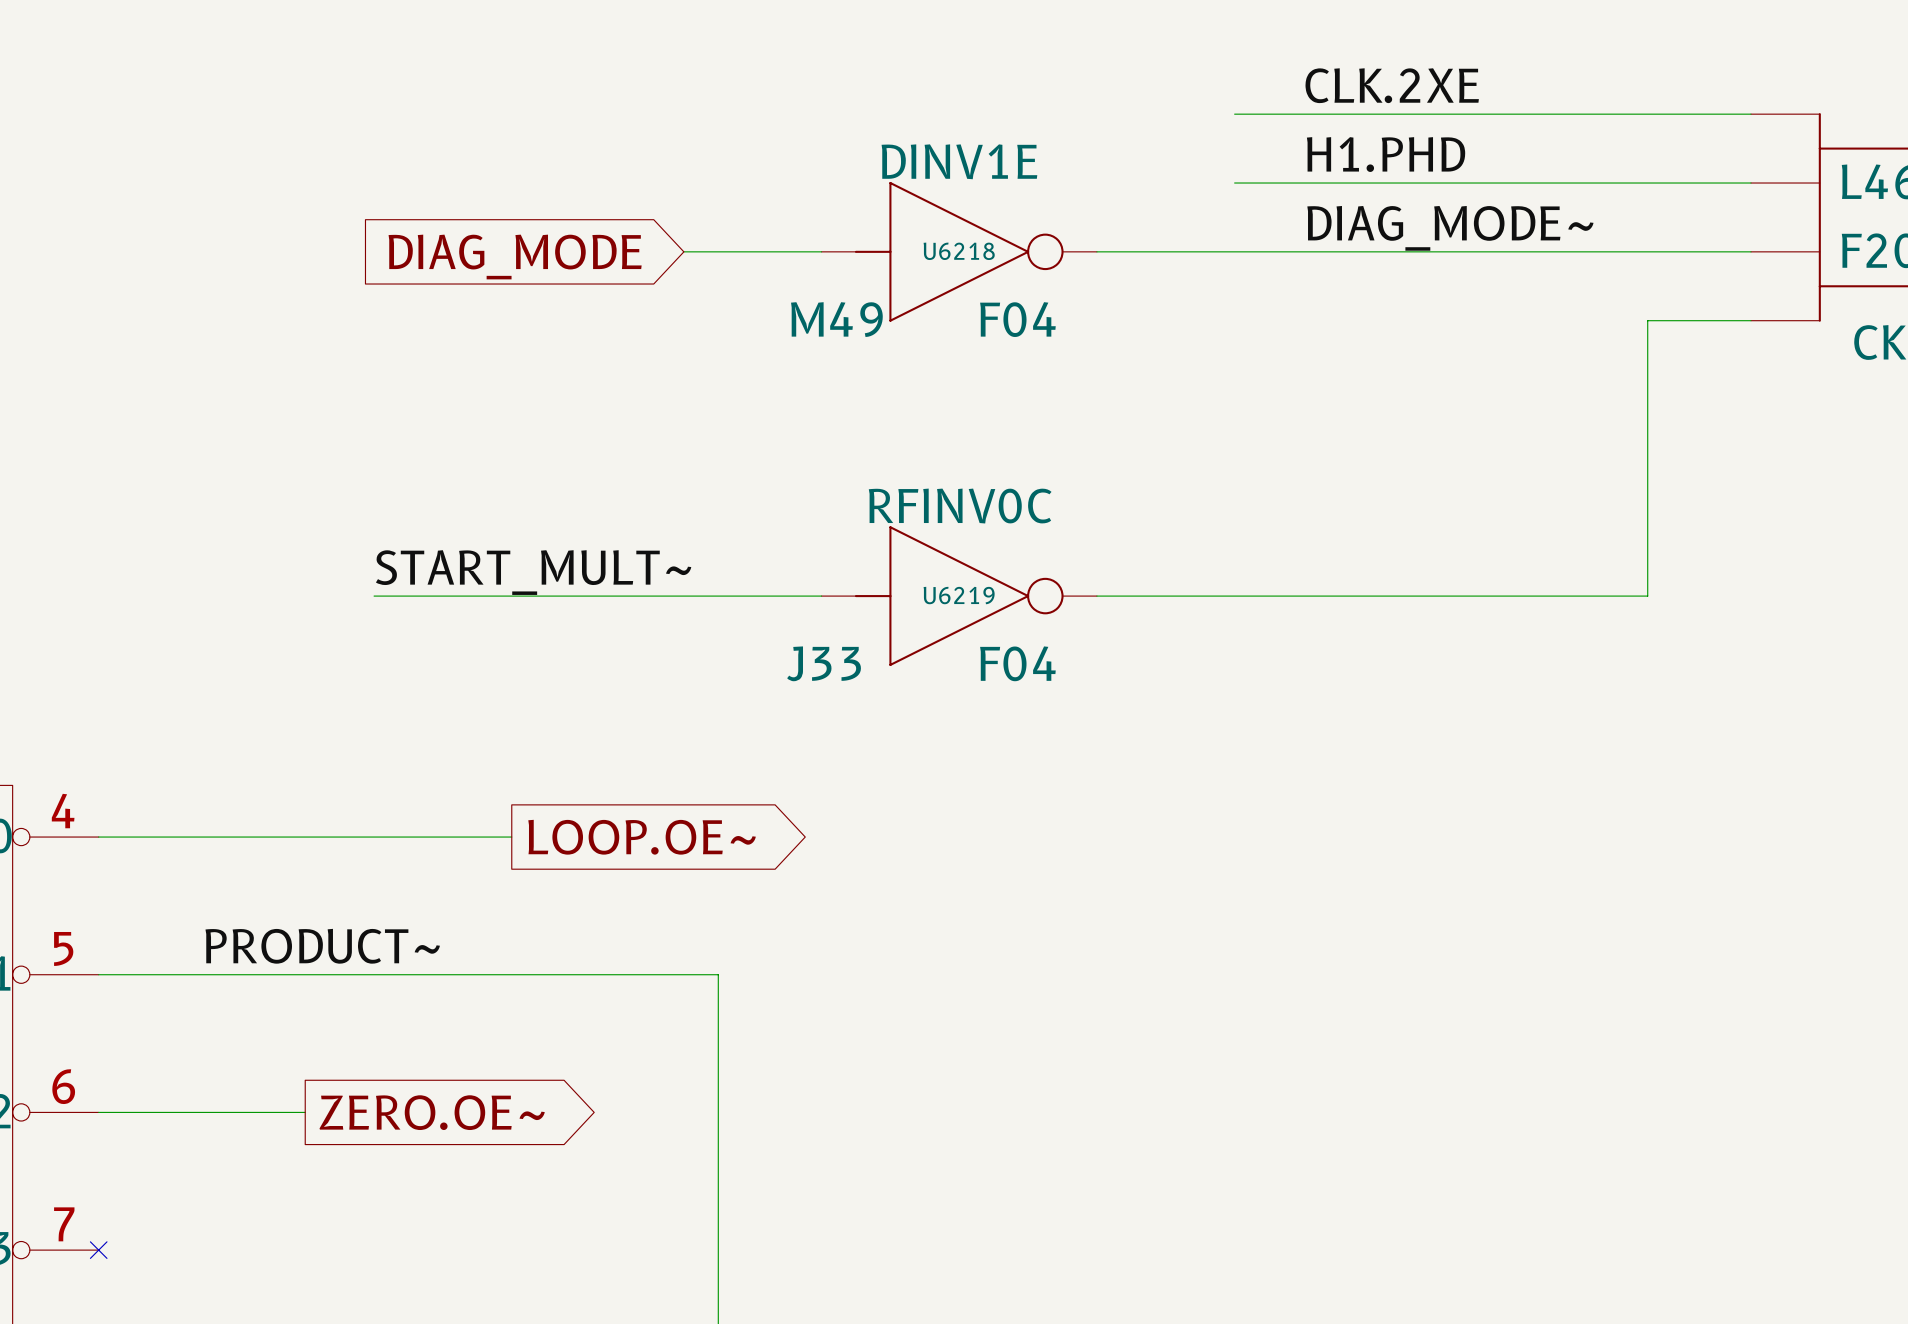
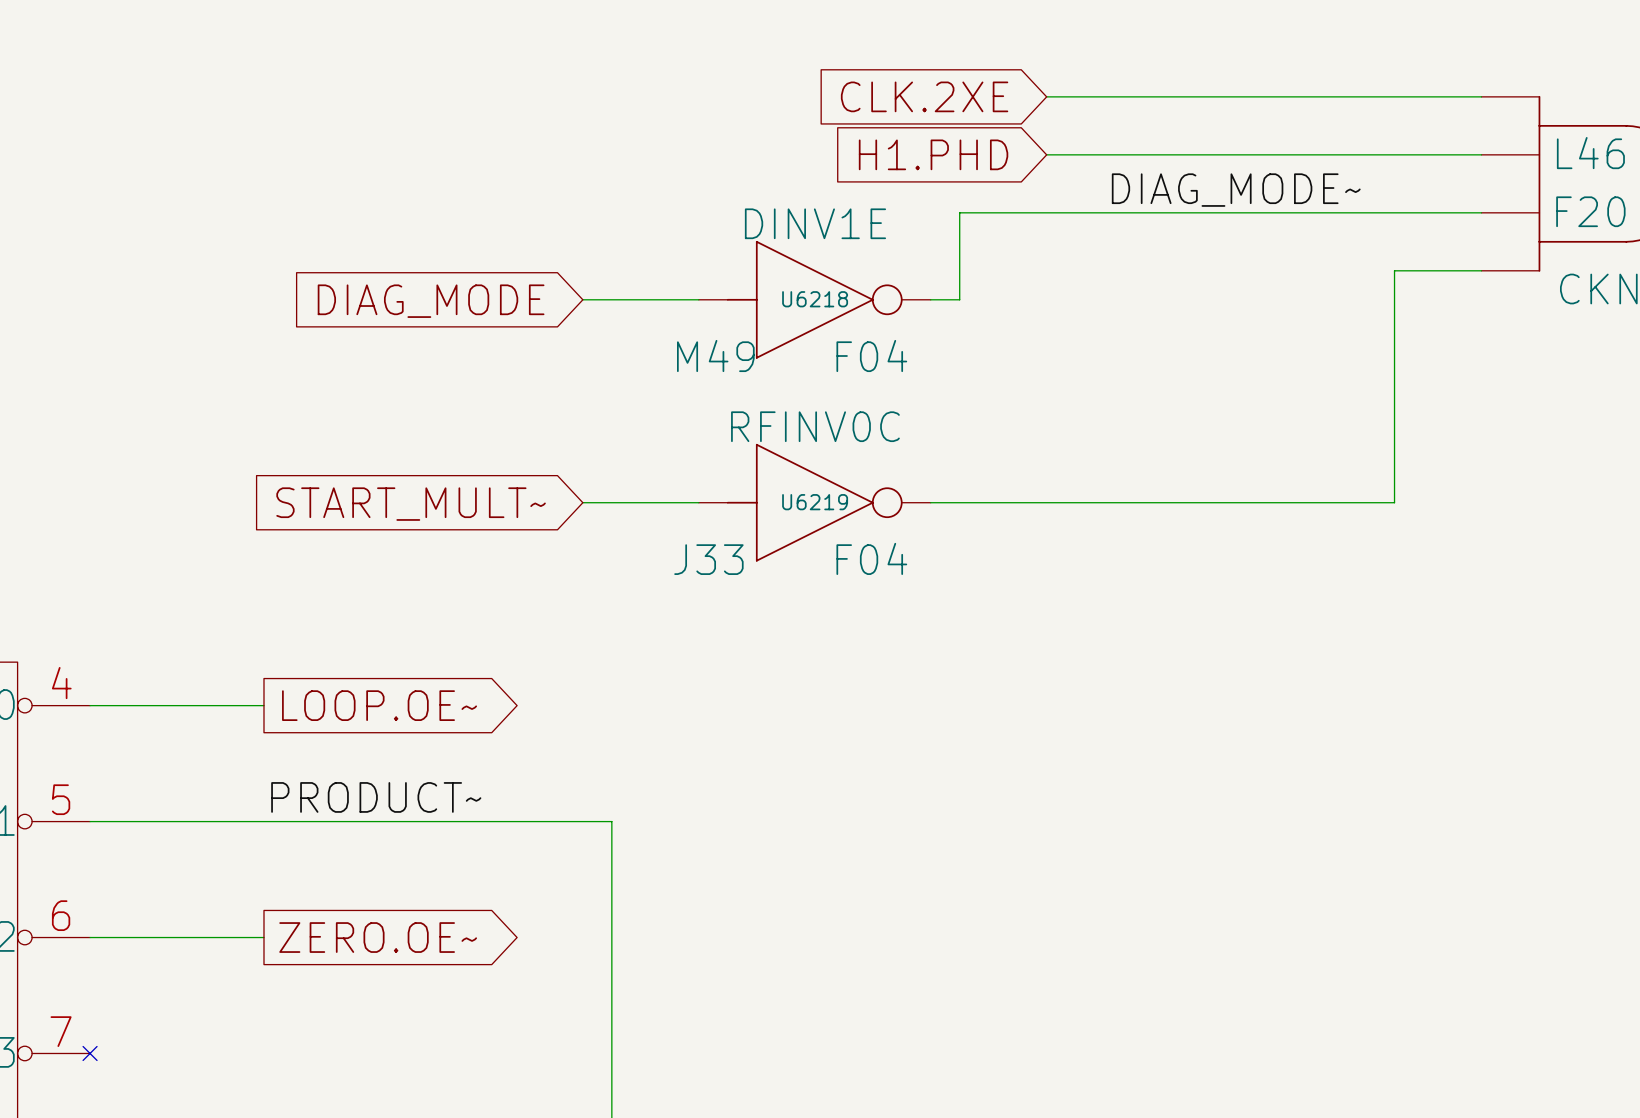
label: CLK.2XE (1392, 85) -> none
global label: none -> CLK.2XE (924, 96)
label: H1.PHD (1386, 154) -> none
global label: none -> H1.PHD (933, 154)
wire: (683, 251) (821, 251) -> (582, 299) (698, 299)
U6218 position: (959, 251) -> (814, 299)
wire: (1096, 251) (1131, 251) -> (930, 299) (959, 299) (959, 212)
global label position: DIAG_MODE (515, 257) -> DIAG_MODE (431, 301)
label: START_MULT~ (533, 572) -> none
wire: (374, 596) (683, 596) -> none
global label: none -> START_MULT~ (411, 504)
wire: (305, 837) (511, 837) -> none
global label position: LOOP.OE~ (642, 837) -> LOOP.OE~ (379, 705)
label position: PRODUCT~ (322, 946) -> PRODUCT~ (376, 797)

